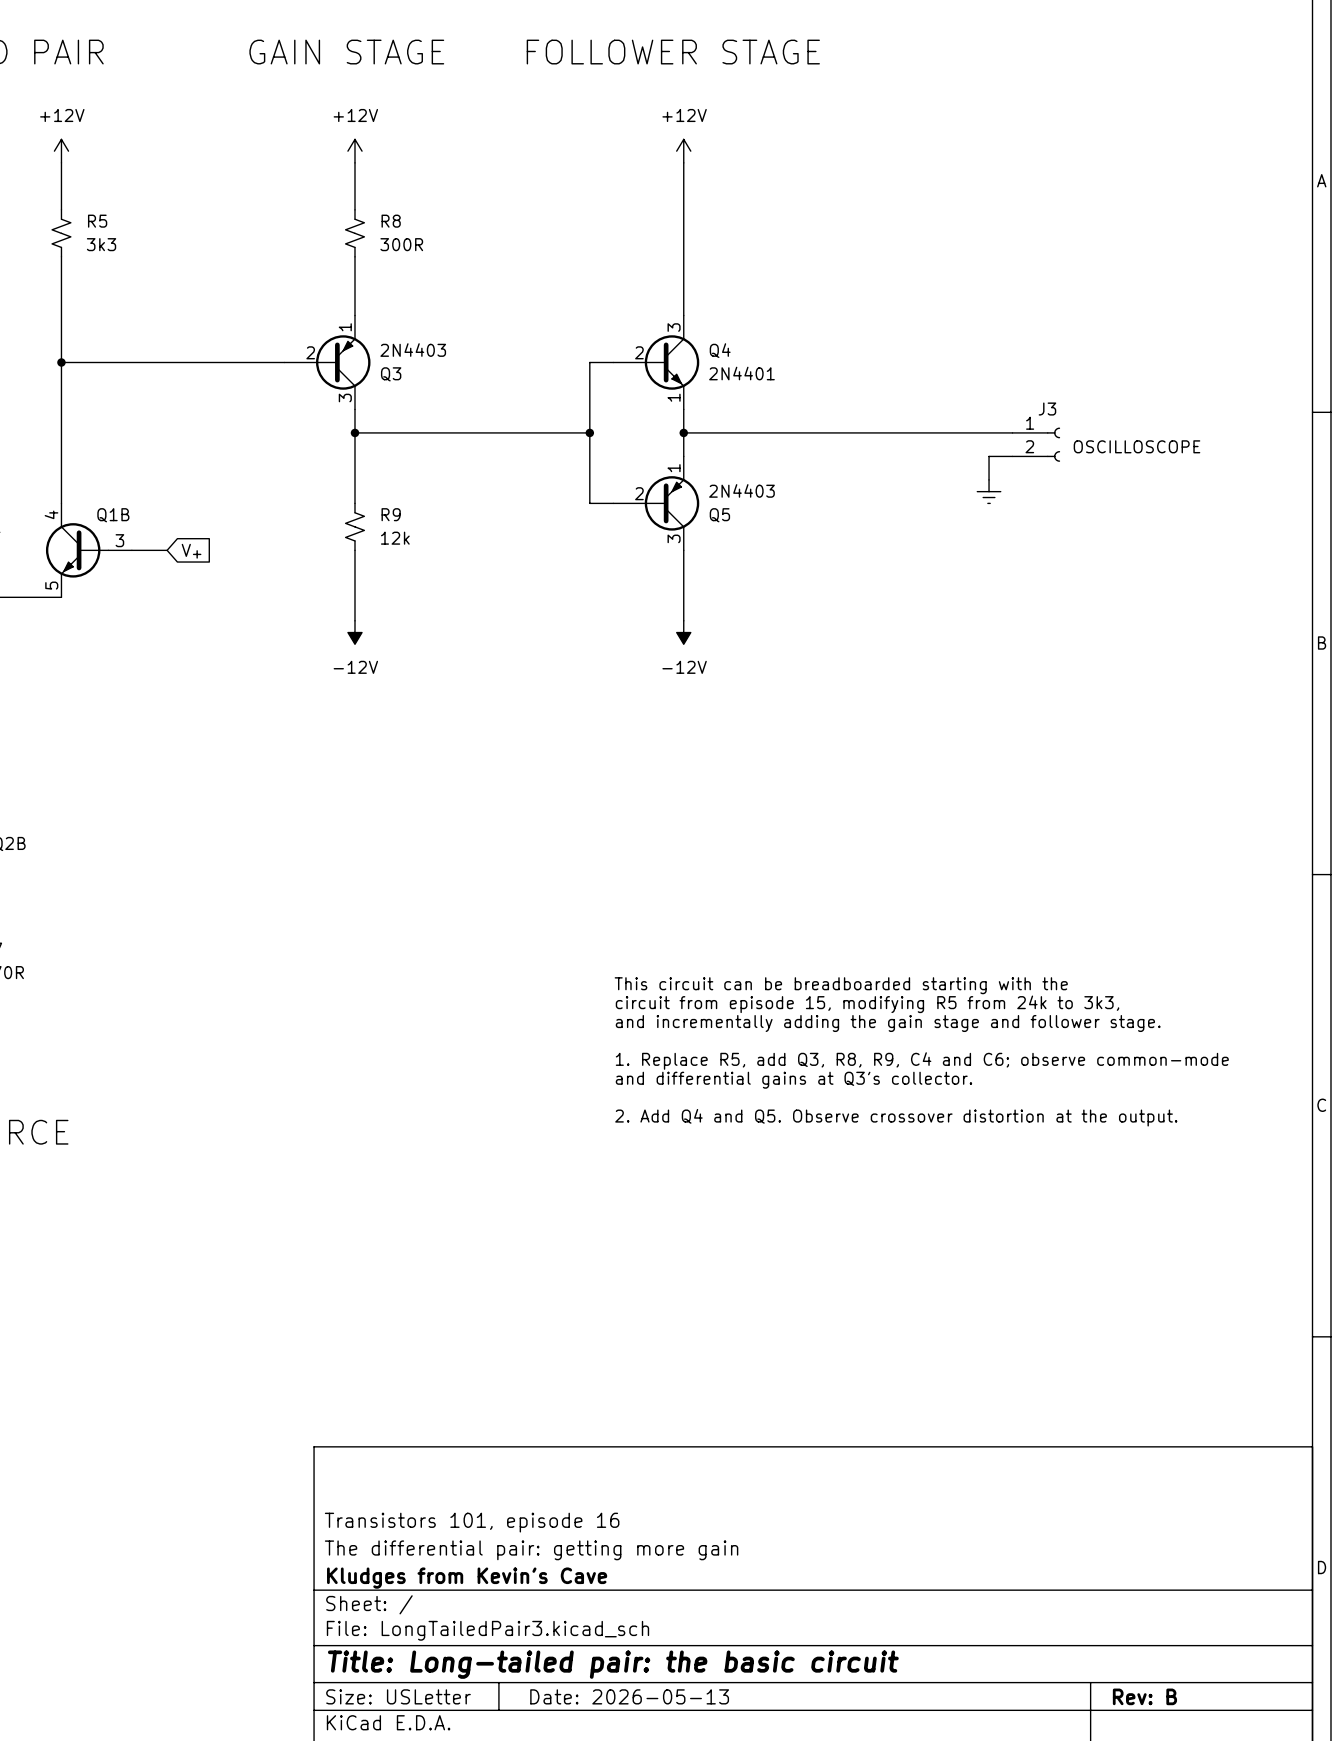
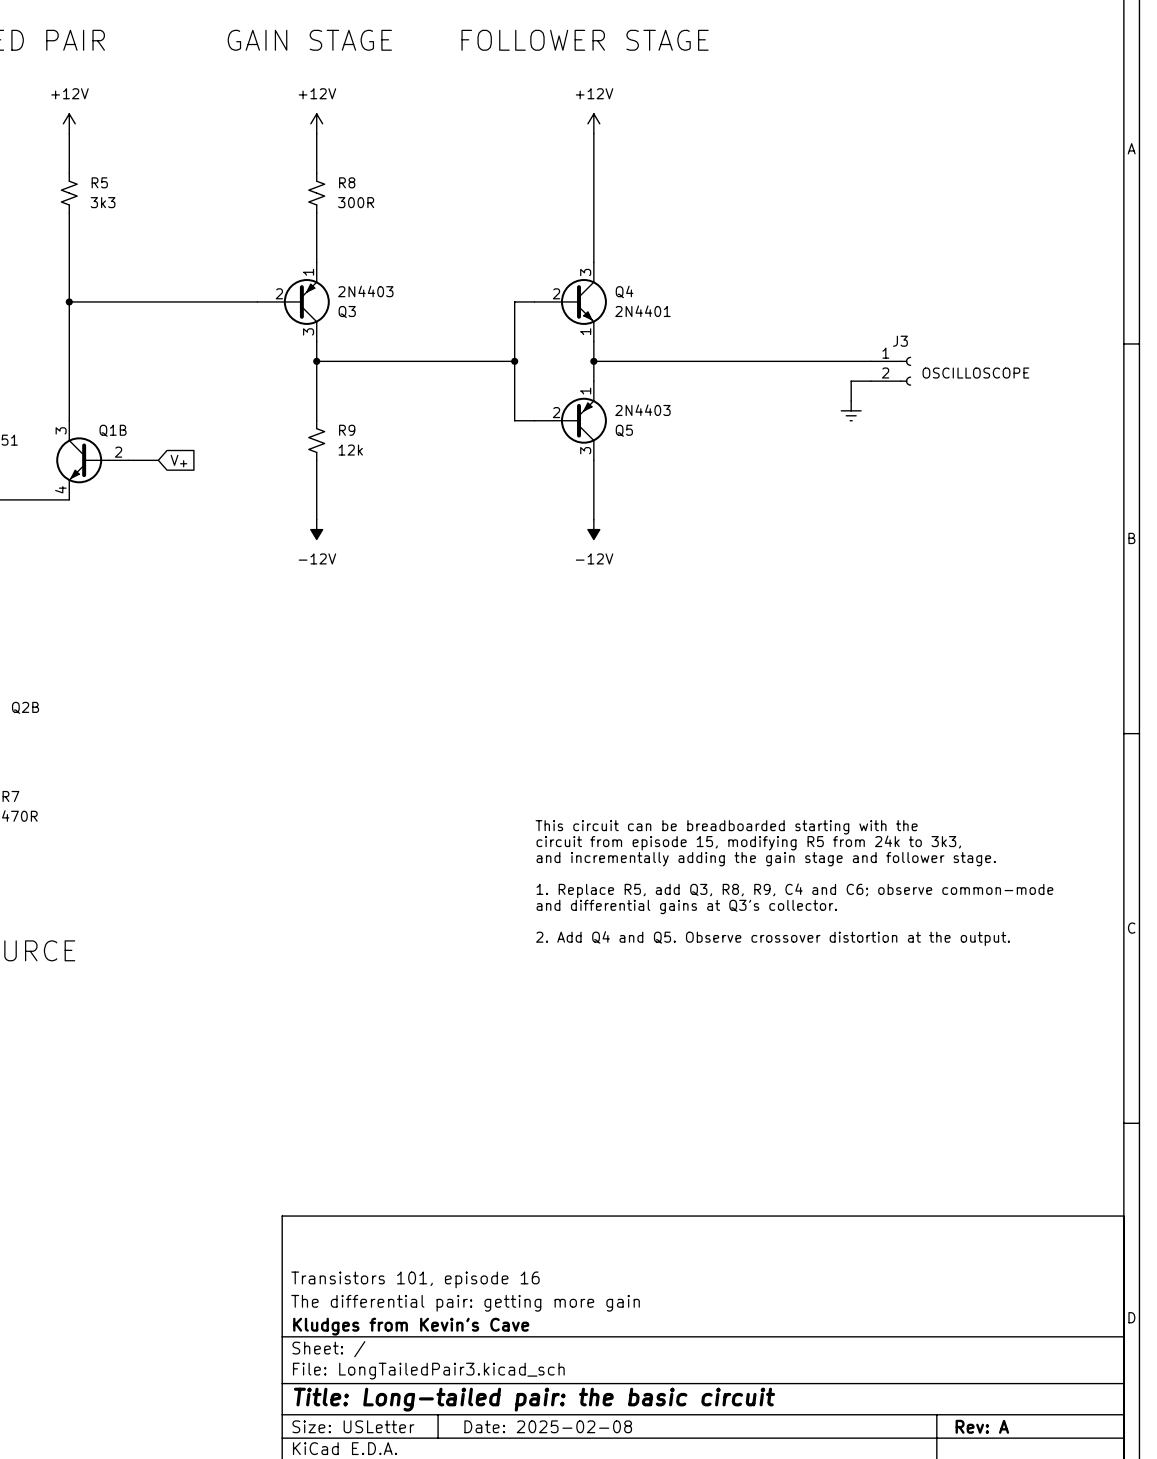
Q1B pin number: 4 (51, 514) -> 3 (61, 430)
Q1B pin number: 3 (119, 540) -> 2 (118, 452)
Q1B pin number: 5 (51, 585) -> 4 (60, 489)
title block: Date: 2026-05-13 (629, 1696) -> Date: 2025-02-08 (548, 1426)
title block: Rev: B (1144, 1696) -> Rev: A (982, 1426)

